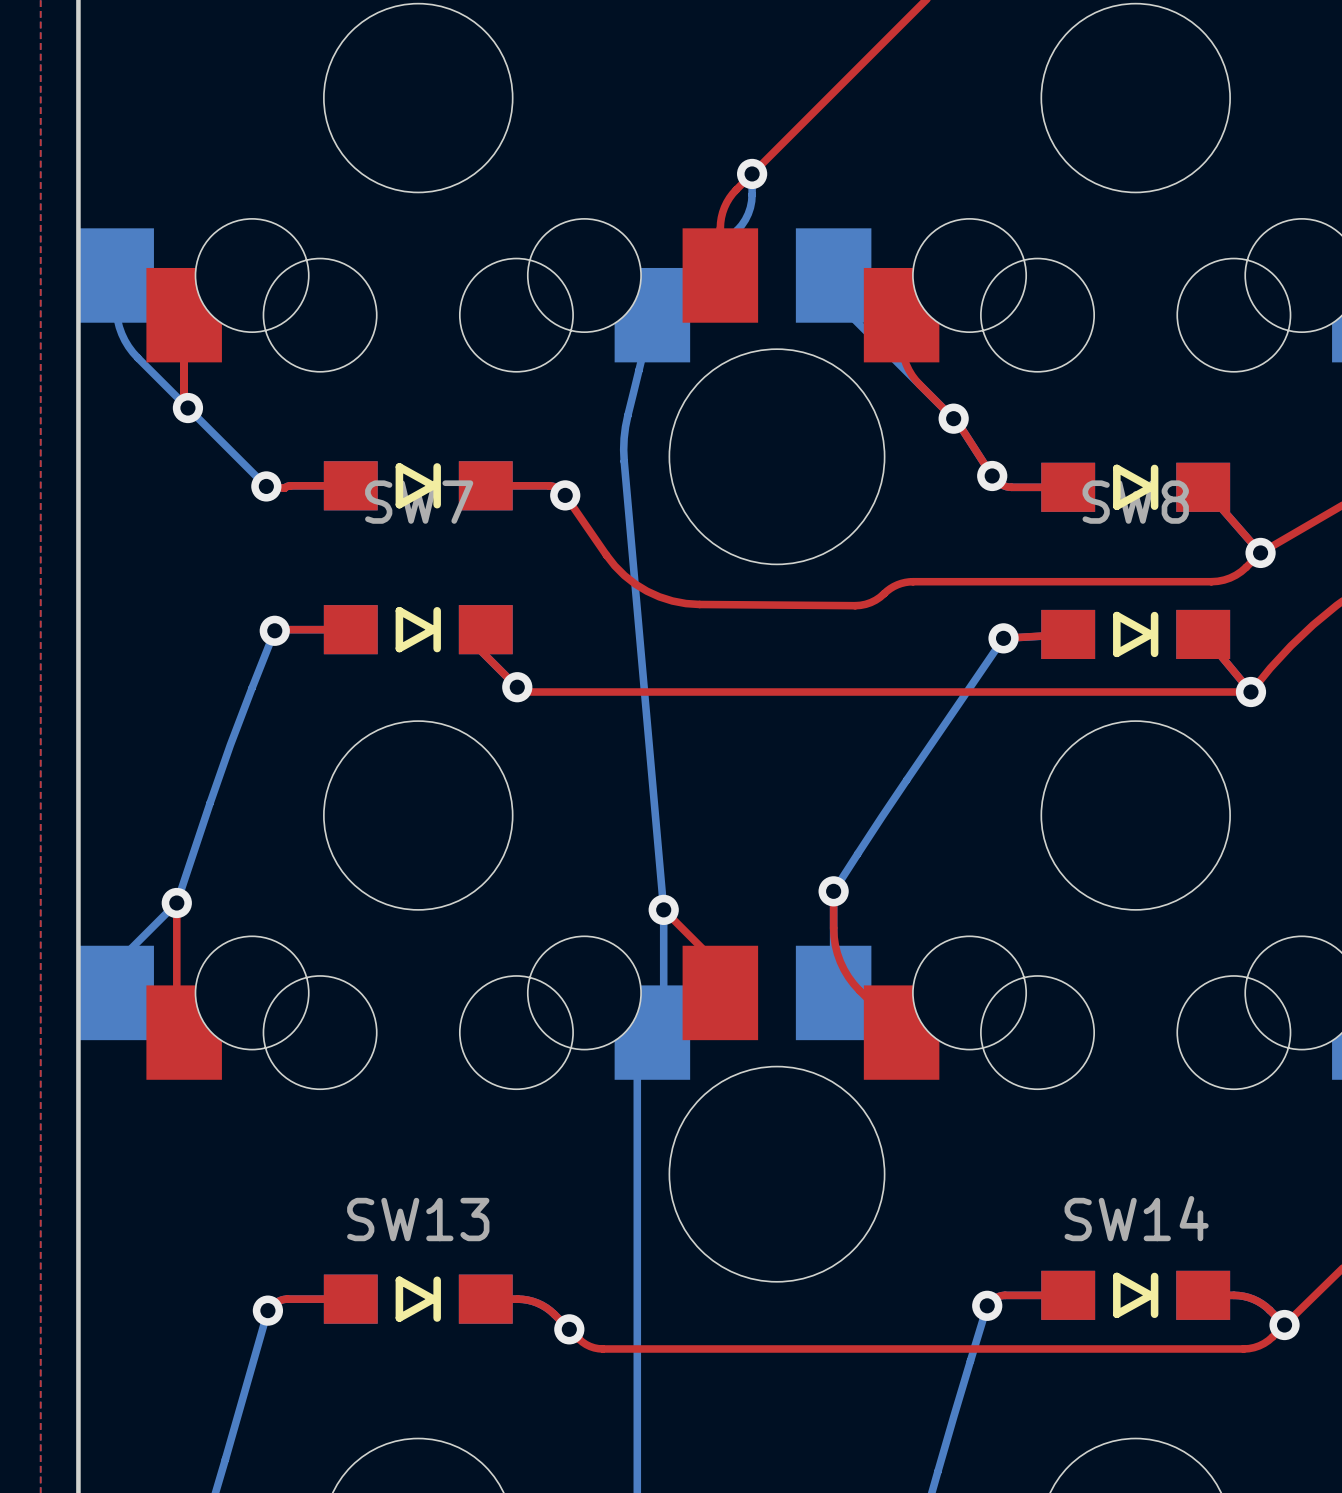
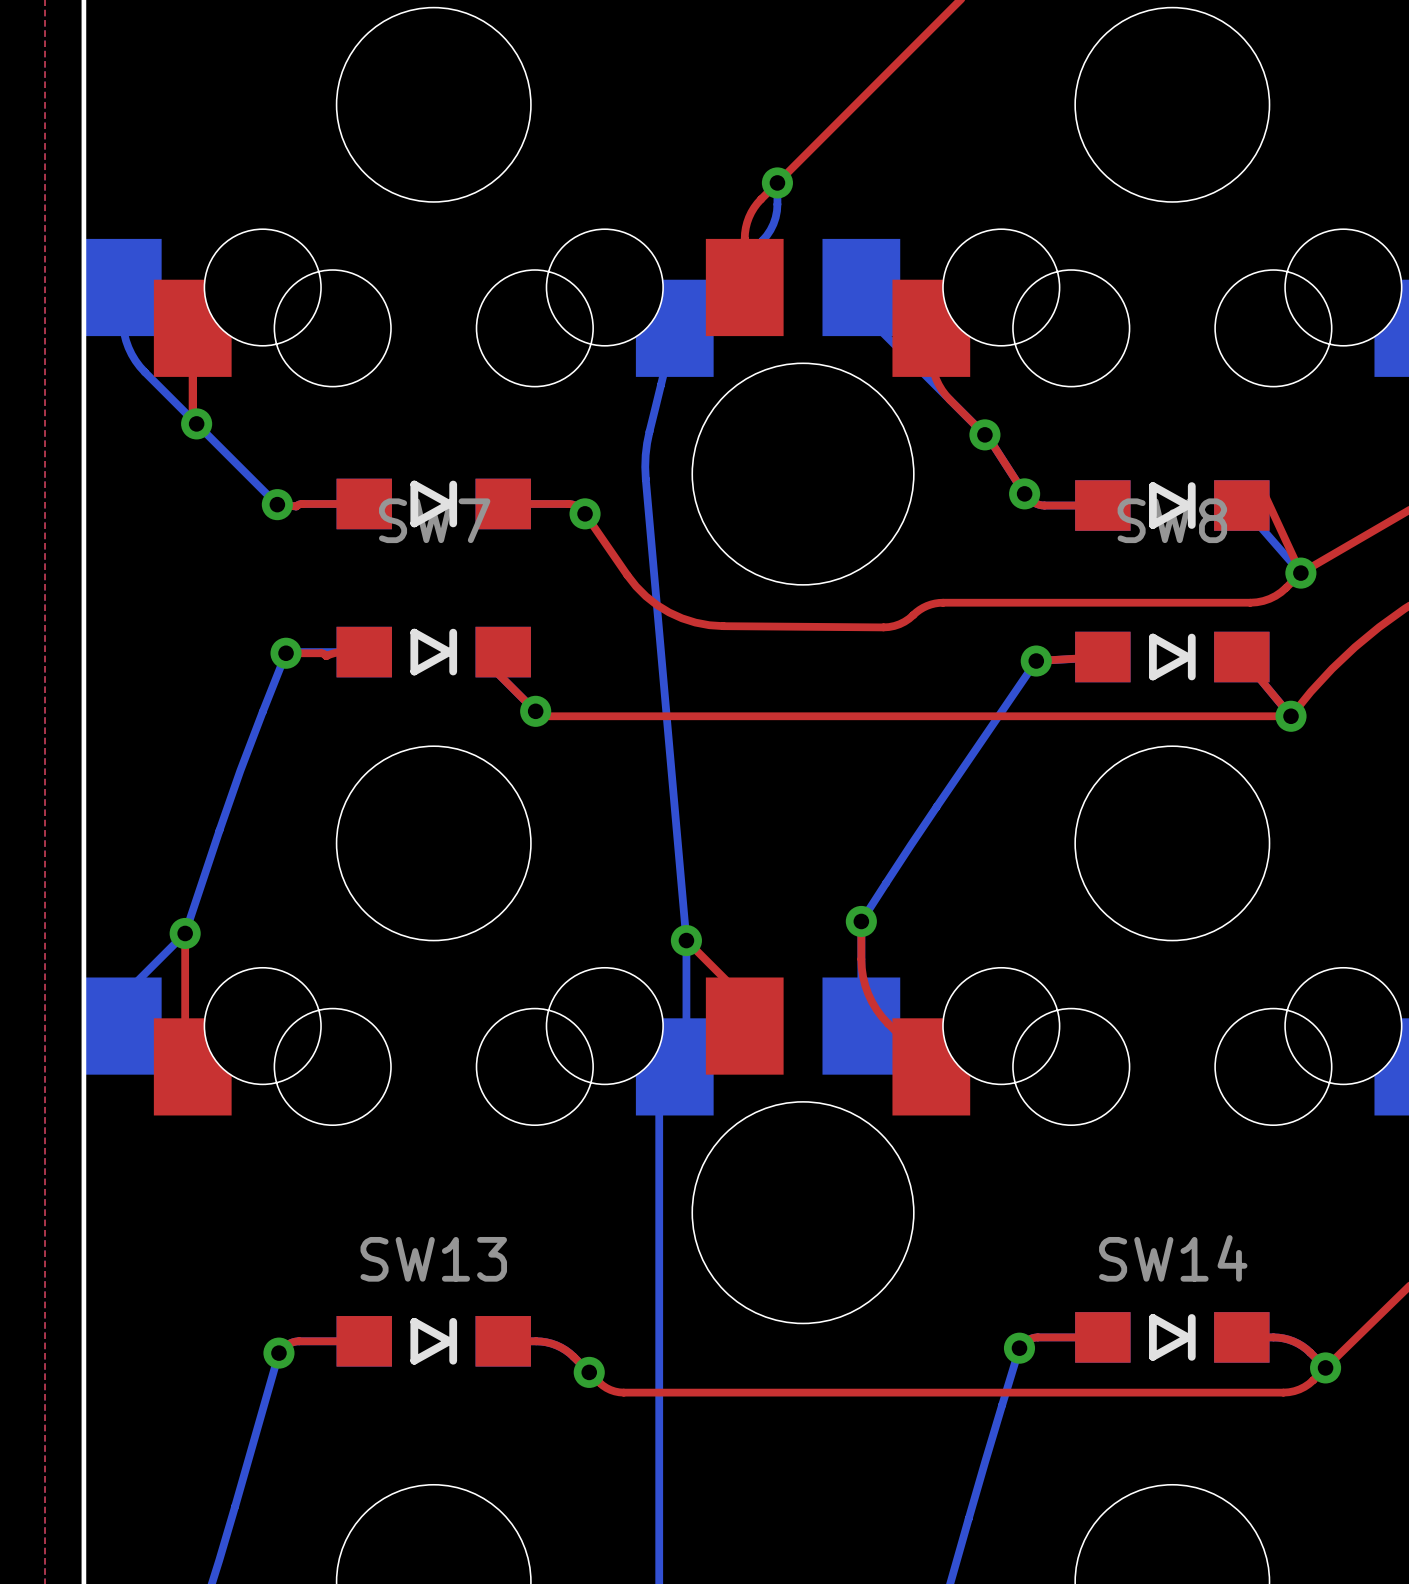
top track: (1203, 487) (1260, 552) -> (1264, 494) (1300, 573)
top track: (350, 629) (274, 630) -> (342, 652) (326, 656) (321, 653) (286, 653)

